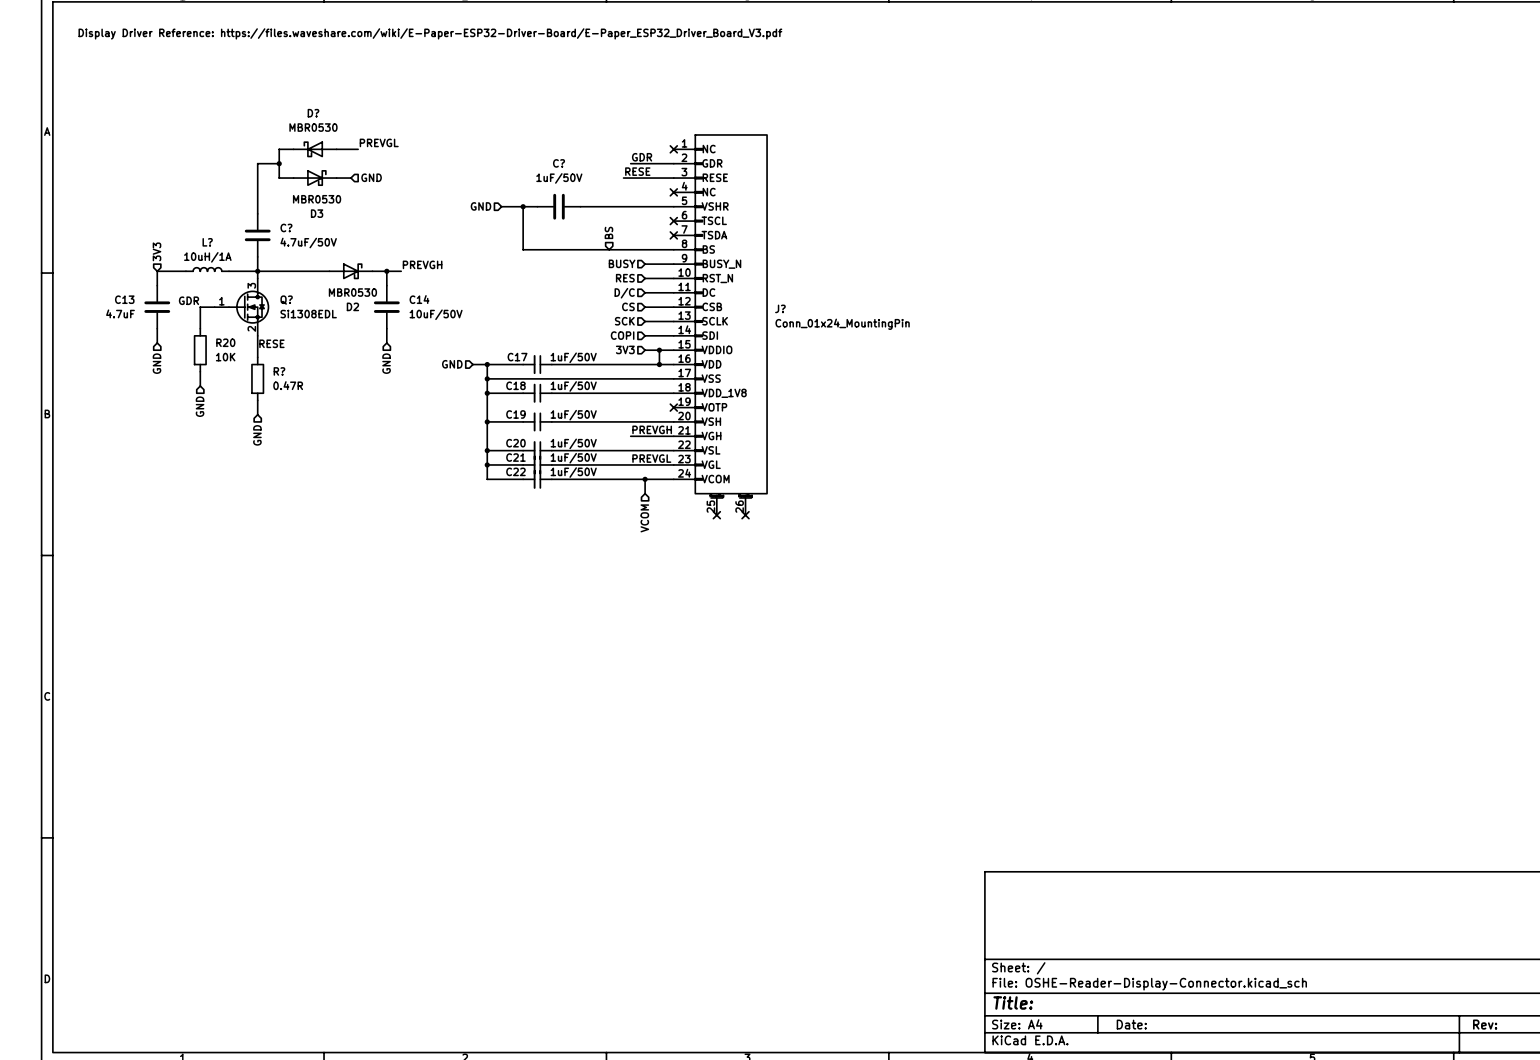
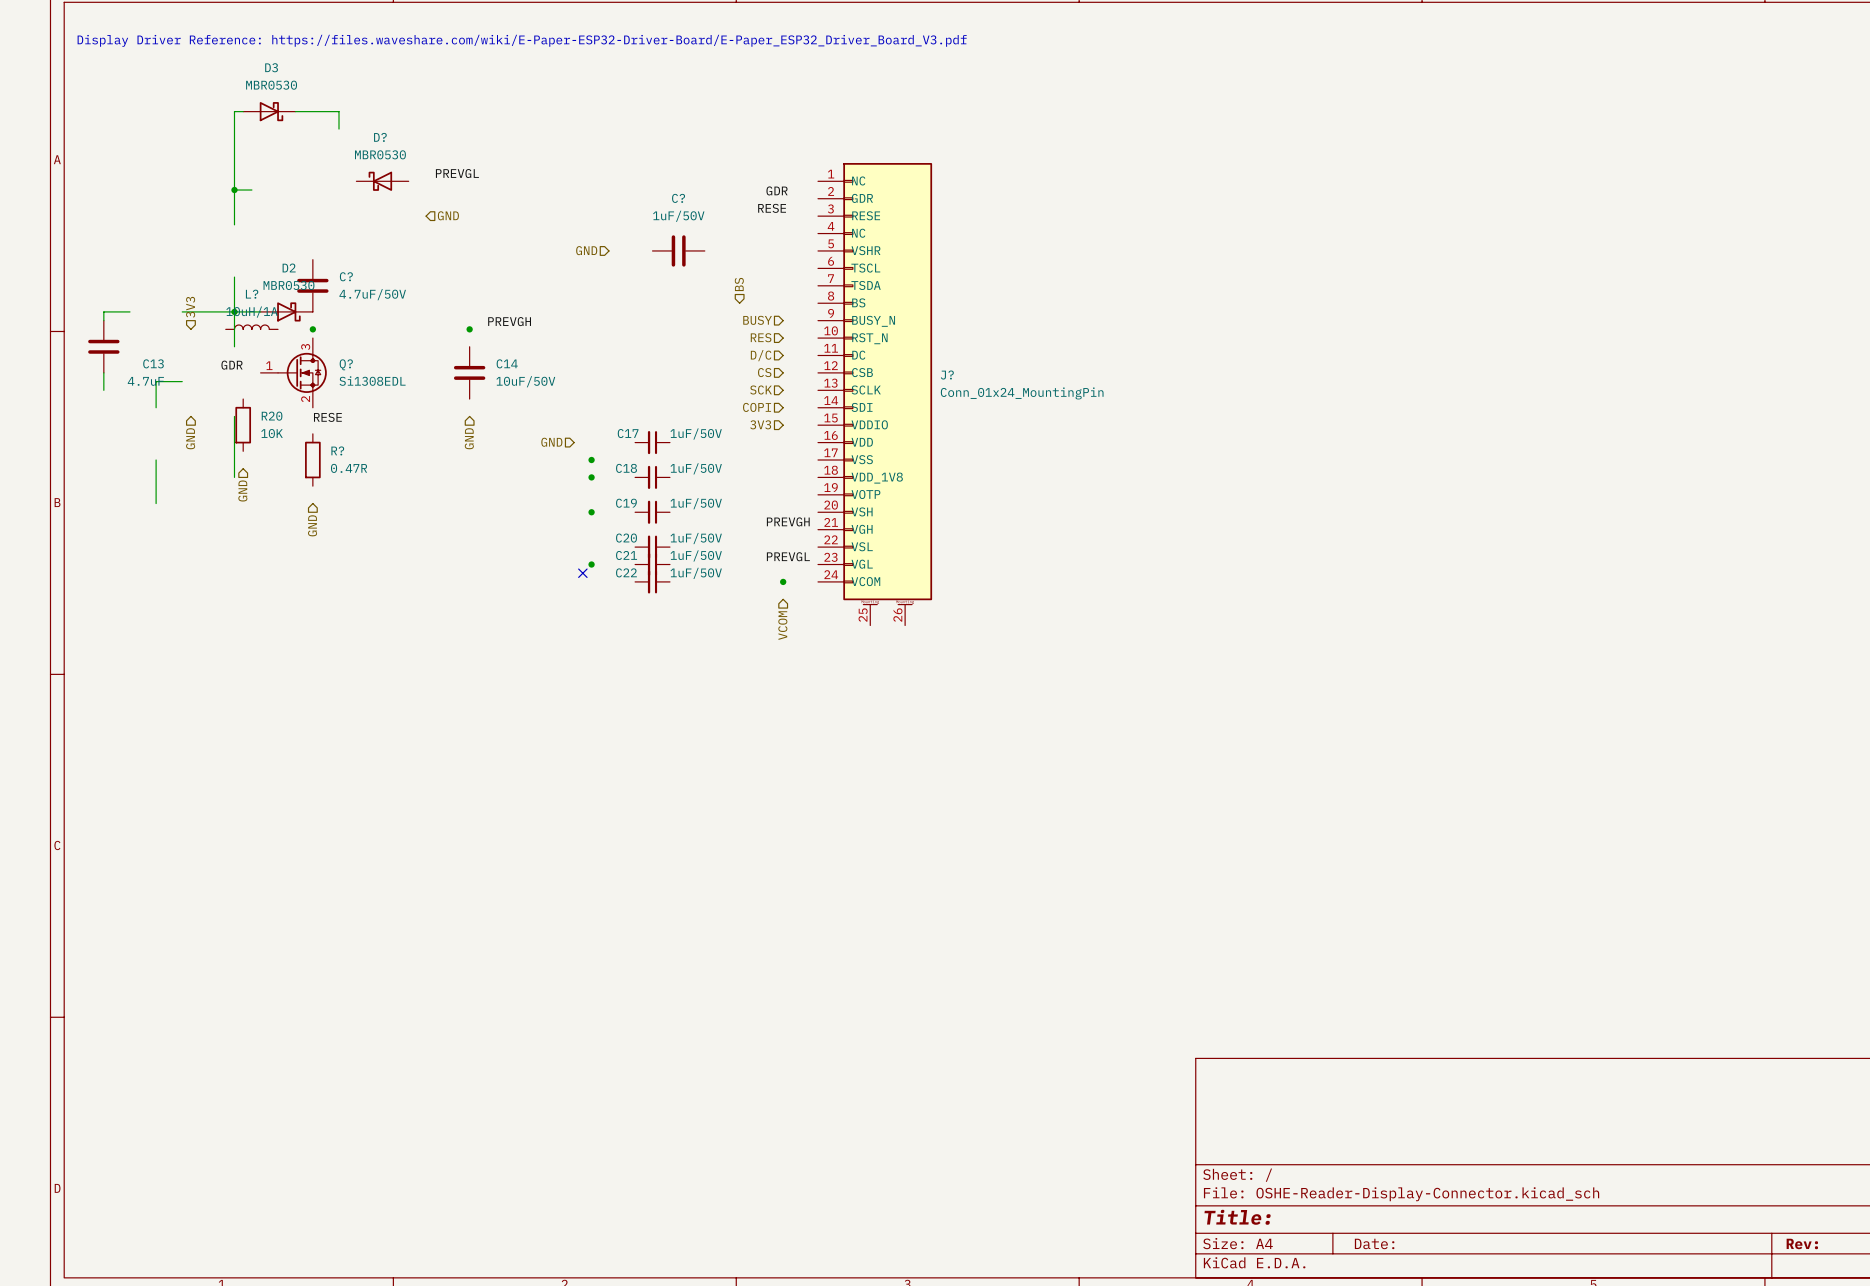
wire: none -> (243, 111) (234, 111) (234, 224)
wire: none -> (295, 111) (338, 111) (338, 129)
wire: (293, 149) (279, 149) (279, 178) (293, 178) -> none
wire: (336, 149) (358, 149) -> none
no-connect mark: (673, 149) -> none
wire: none -> (234, 190) (251, 190)
junction: none -> (234, 190)
wire: (279, 163) (257, 163) (257, 213) -> none
junction: (279, 163) -> none
wire: (630, 163) (673, 163) -> none
D3 position: (315, 178) -> (269, 111)
D3 flip: as is (316, 178) -> up-down (271, 111)
wire: (336, 178) (350, 178) -> none
wire: (623, 178) (673, 178) -> none
no-connect mark: (673, 192) -> none
wire: (501, 206) (537, 206) -> none
wire: (523, 206) (523, 249) (673, 249) -> none
junction: (523, 206) -> none
wire: (580, 206) (673, 206) -> none
no-connect mark: (673, 221) -> none
wire: none -> (234, 277) (234, 346)
no-connect mark: (673, 235) -> none
wire: none -> (129, 311) (103, 311) (103, 320)
wire: none -> (182, 311) (260, 311)
junction: none -> (234, 311)
wire: (257, 256) (257, 278) -> none
wire: (645, 264) (673, 264) -> none
wire: (185, 271) (157, 271) (157, 285) -> none
wire: (229, 271) (329, 271) -> none
D2 position: (350, 271) -> (286, 311)
D2 flip: as is (352, 271) -> up-down (288, 311)
wire: (372, 271) (401, 271) -> none
wire: (386, 271) (386, 285) -> none
wire: (645, 278) (673, 278) -> none
wire: (645, 292) (673, 292) -> none
C13 position: (157, 307) -> (103, 346)
wire: (214, 307) (200, 307) (200, 328) -> none
wire: (645, 307) (673, 307) -> none
wire: none -> (182, 381) (156, 381) (156, 407)
wire: (645, 321) (673, 321) -> none
wire: (157, 328) (157, 343) -> (103, 372) (103, 390)
wire: (386, 328) (386, 343) -> none
wire: (257, 335) (257, 357) -> none
wire: (645, 335) (673, 335) -> none
wire: none -> (234, 416) (234, 477)
wire: (645, 350) (673, 350) -> none
wire: (659, 350) (659, 364) -> none
junction: (659, 350) -> none
wire: (472, 364) (523, 364) -> none
wire: (487, 364) (487, 479) (523, 479) -> none
junction: (487, 364) -> none
wire: (551, 364) (673, 364) -> none
junction: (659, 364) -> none
wire: (200, 371) (200, 386) -> none
wire: none -> (156, 460) (156, 503)
wire: (487, 378) (673, 378) -> none
wire: (487, 393) (523, 393) -> none
wire: (551, 393) (673, 393) -> none
wire: (257, 400) (257, 414) -> none
no-connect mark: (673, 407) -> none
wire: (487, 421) (523, 421) -> none
wire: (551, 421) (673, 421) -> none
wire: (630, 436) (673, 436) -> none
wire: (487, 450) (523, 450) -> none
junction: (487, 450) -> none
wire: (551, 450) (673, 450) -> none
wire: (487, 464) (523, 464) -> none
wire: (551, 464) (673, 464) -> none
no-connect mark: none -> (582, 573)
wire: (551, 479) (673, 479) -> none
wire: (645, 479) (645, 493) -> none
no-connect mark: (716, 515) -> none
no-connect mark: (745, 515) -> none

